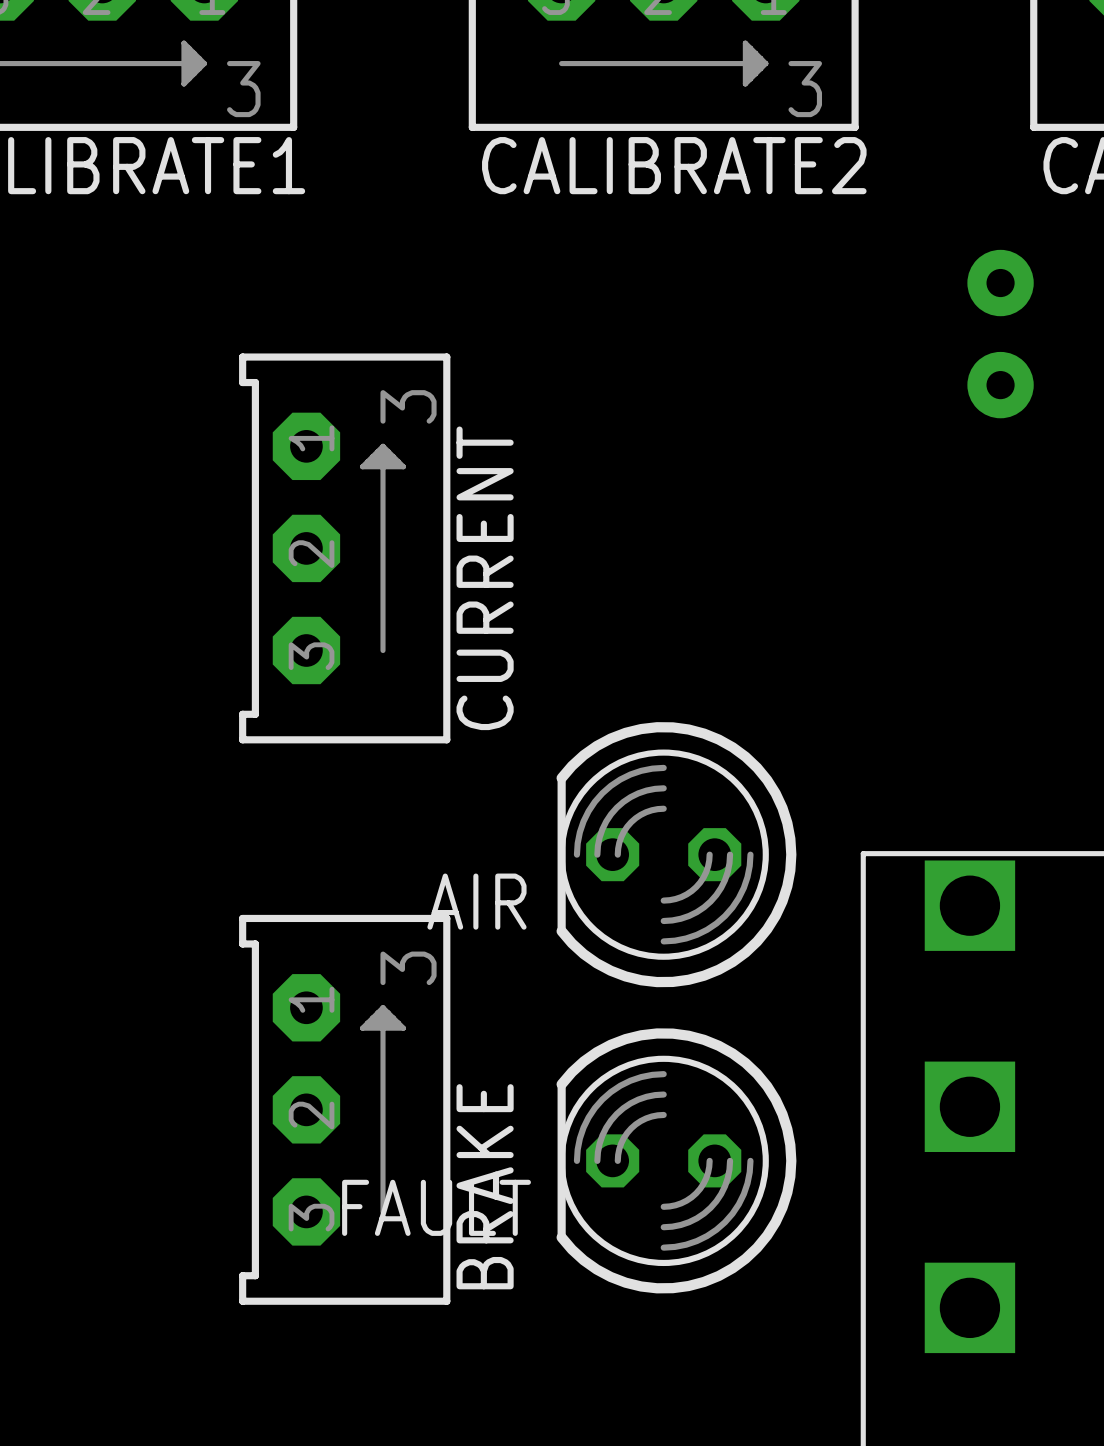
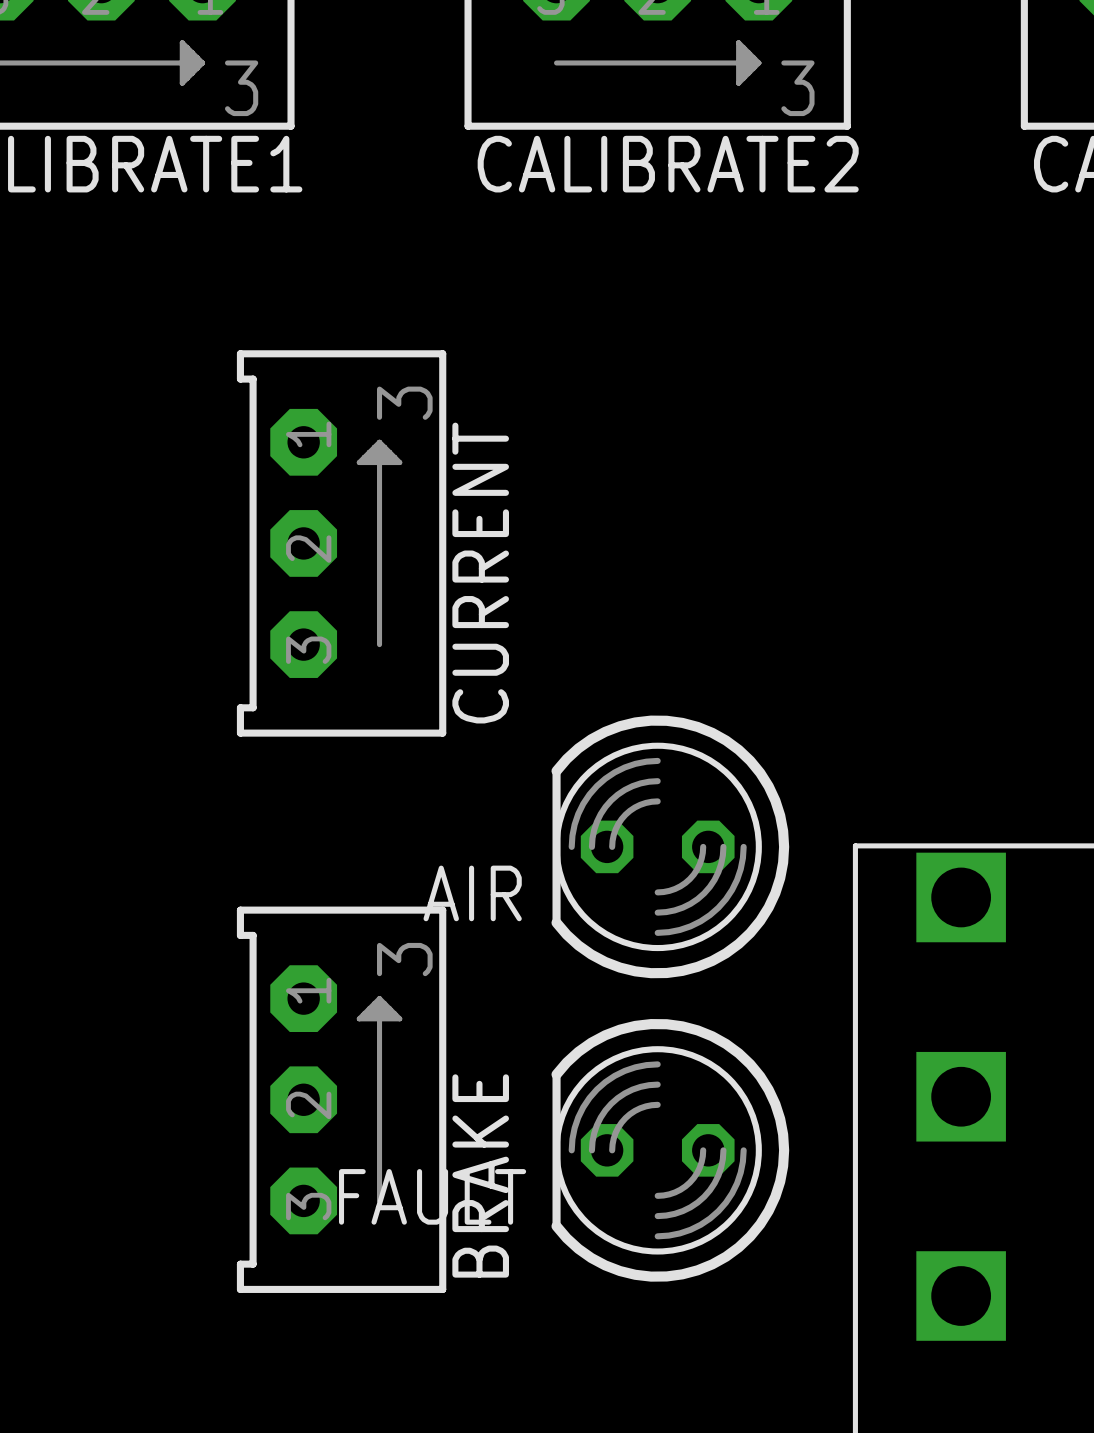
part: (1000, 334) -> none

